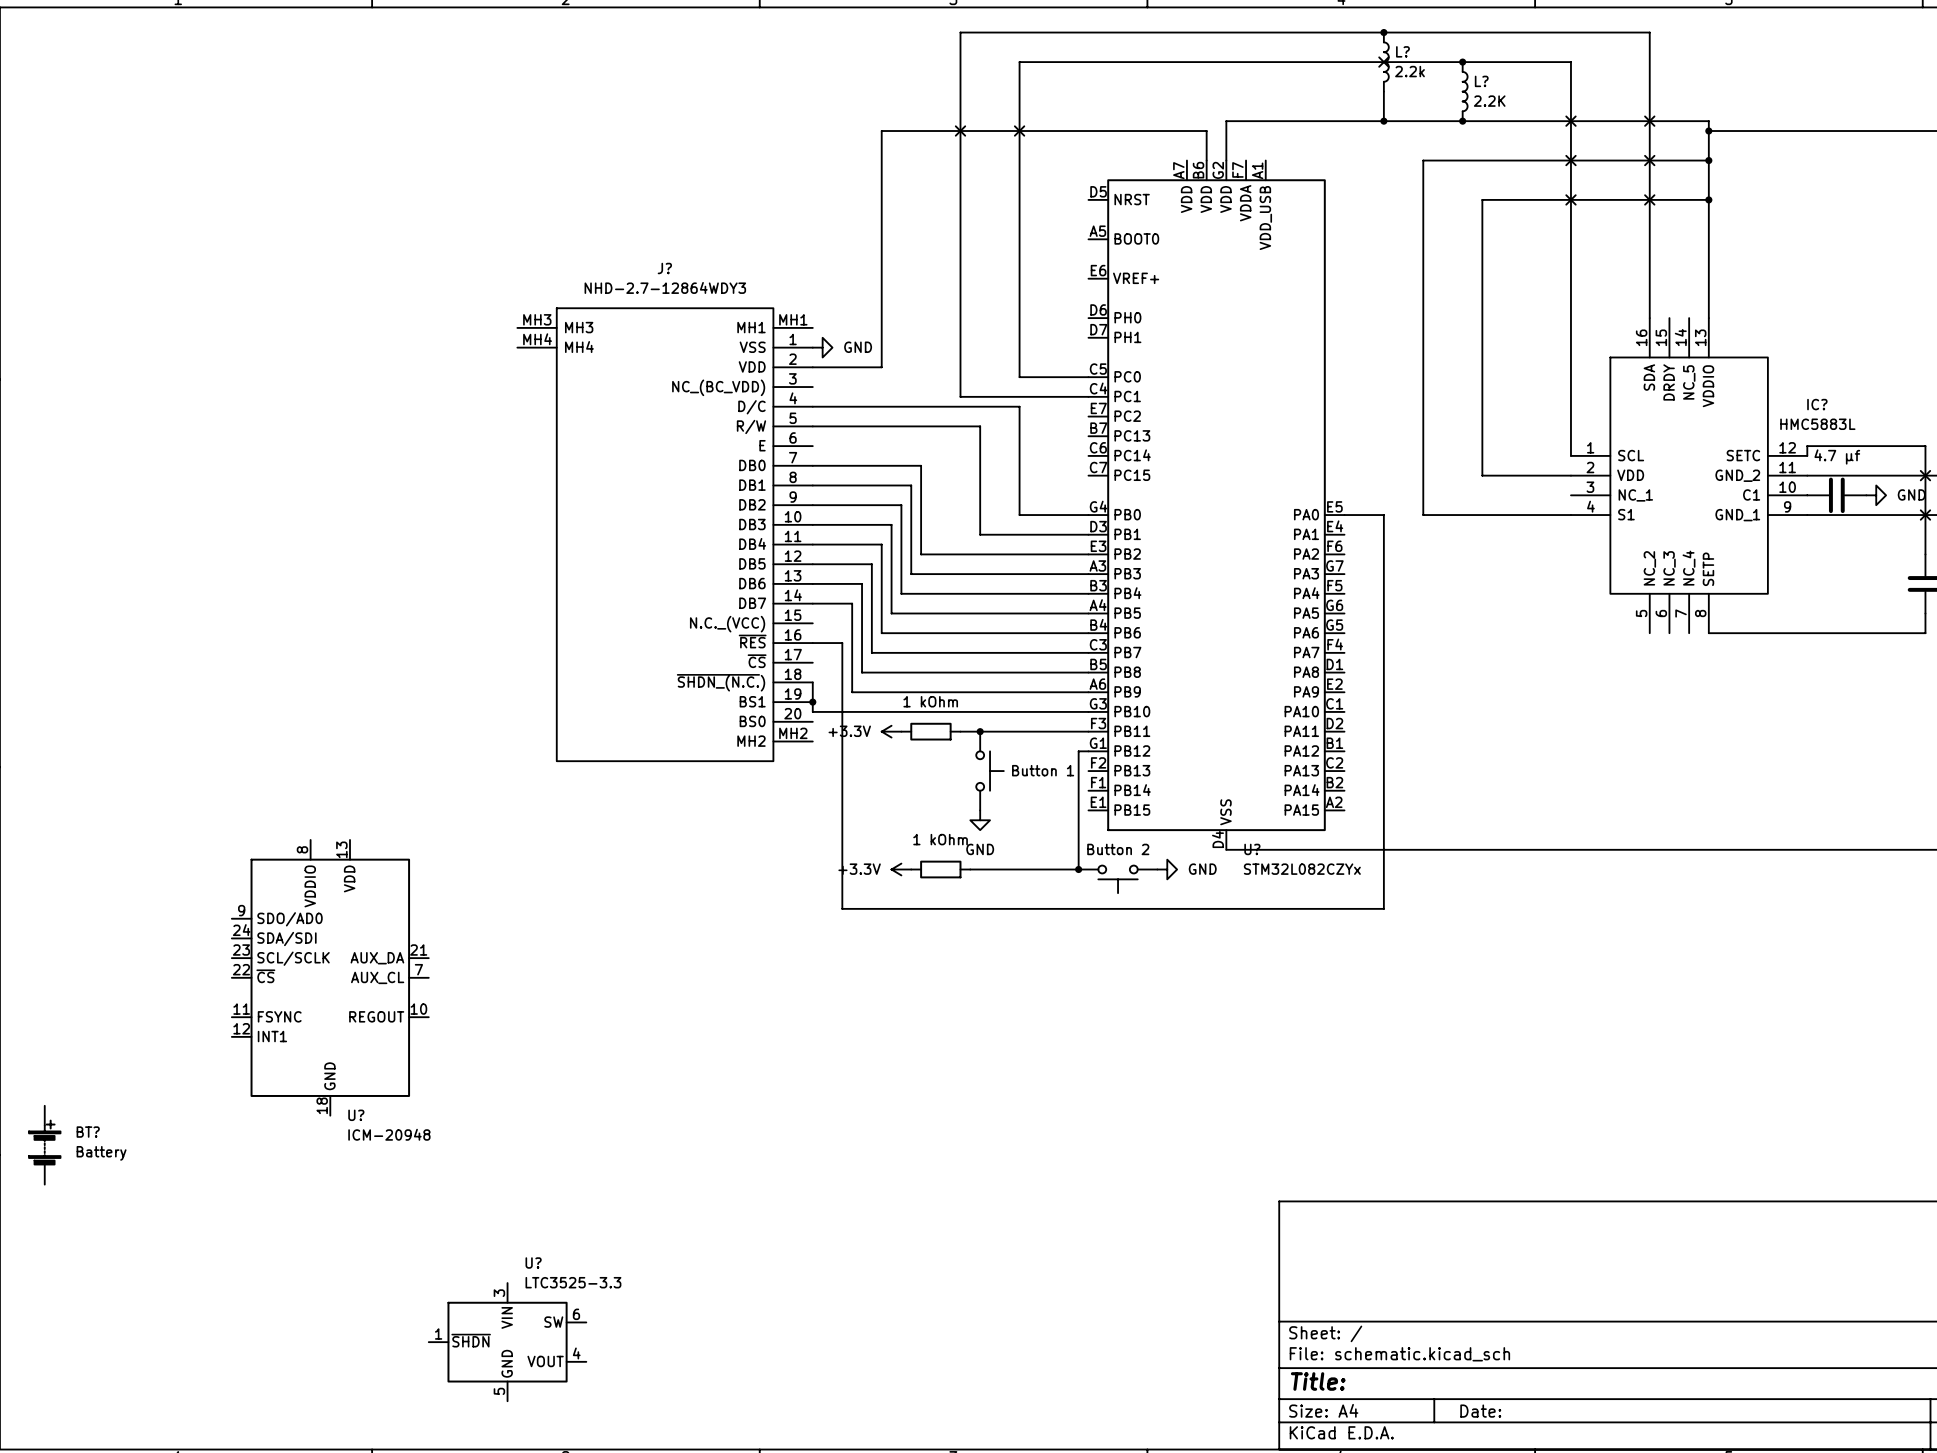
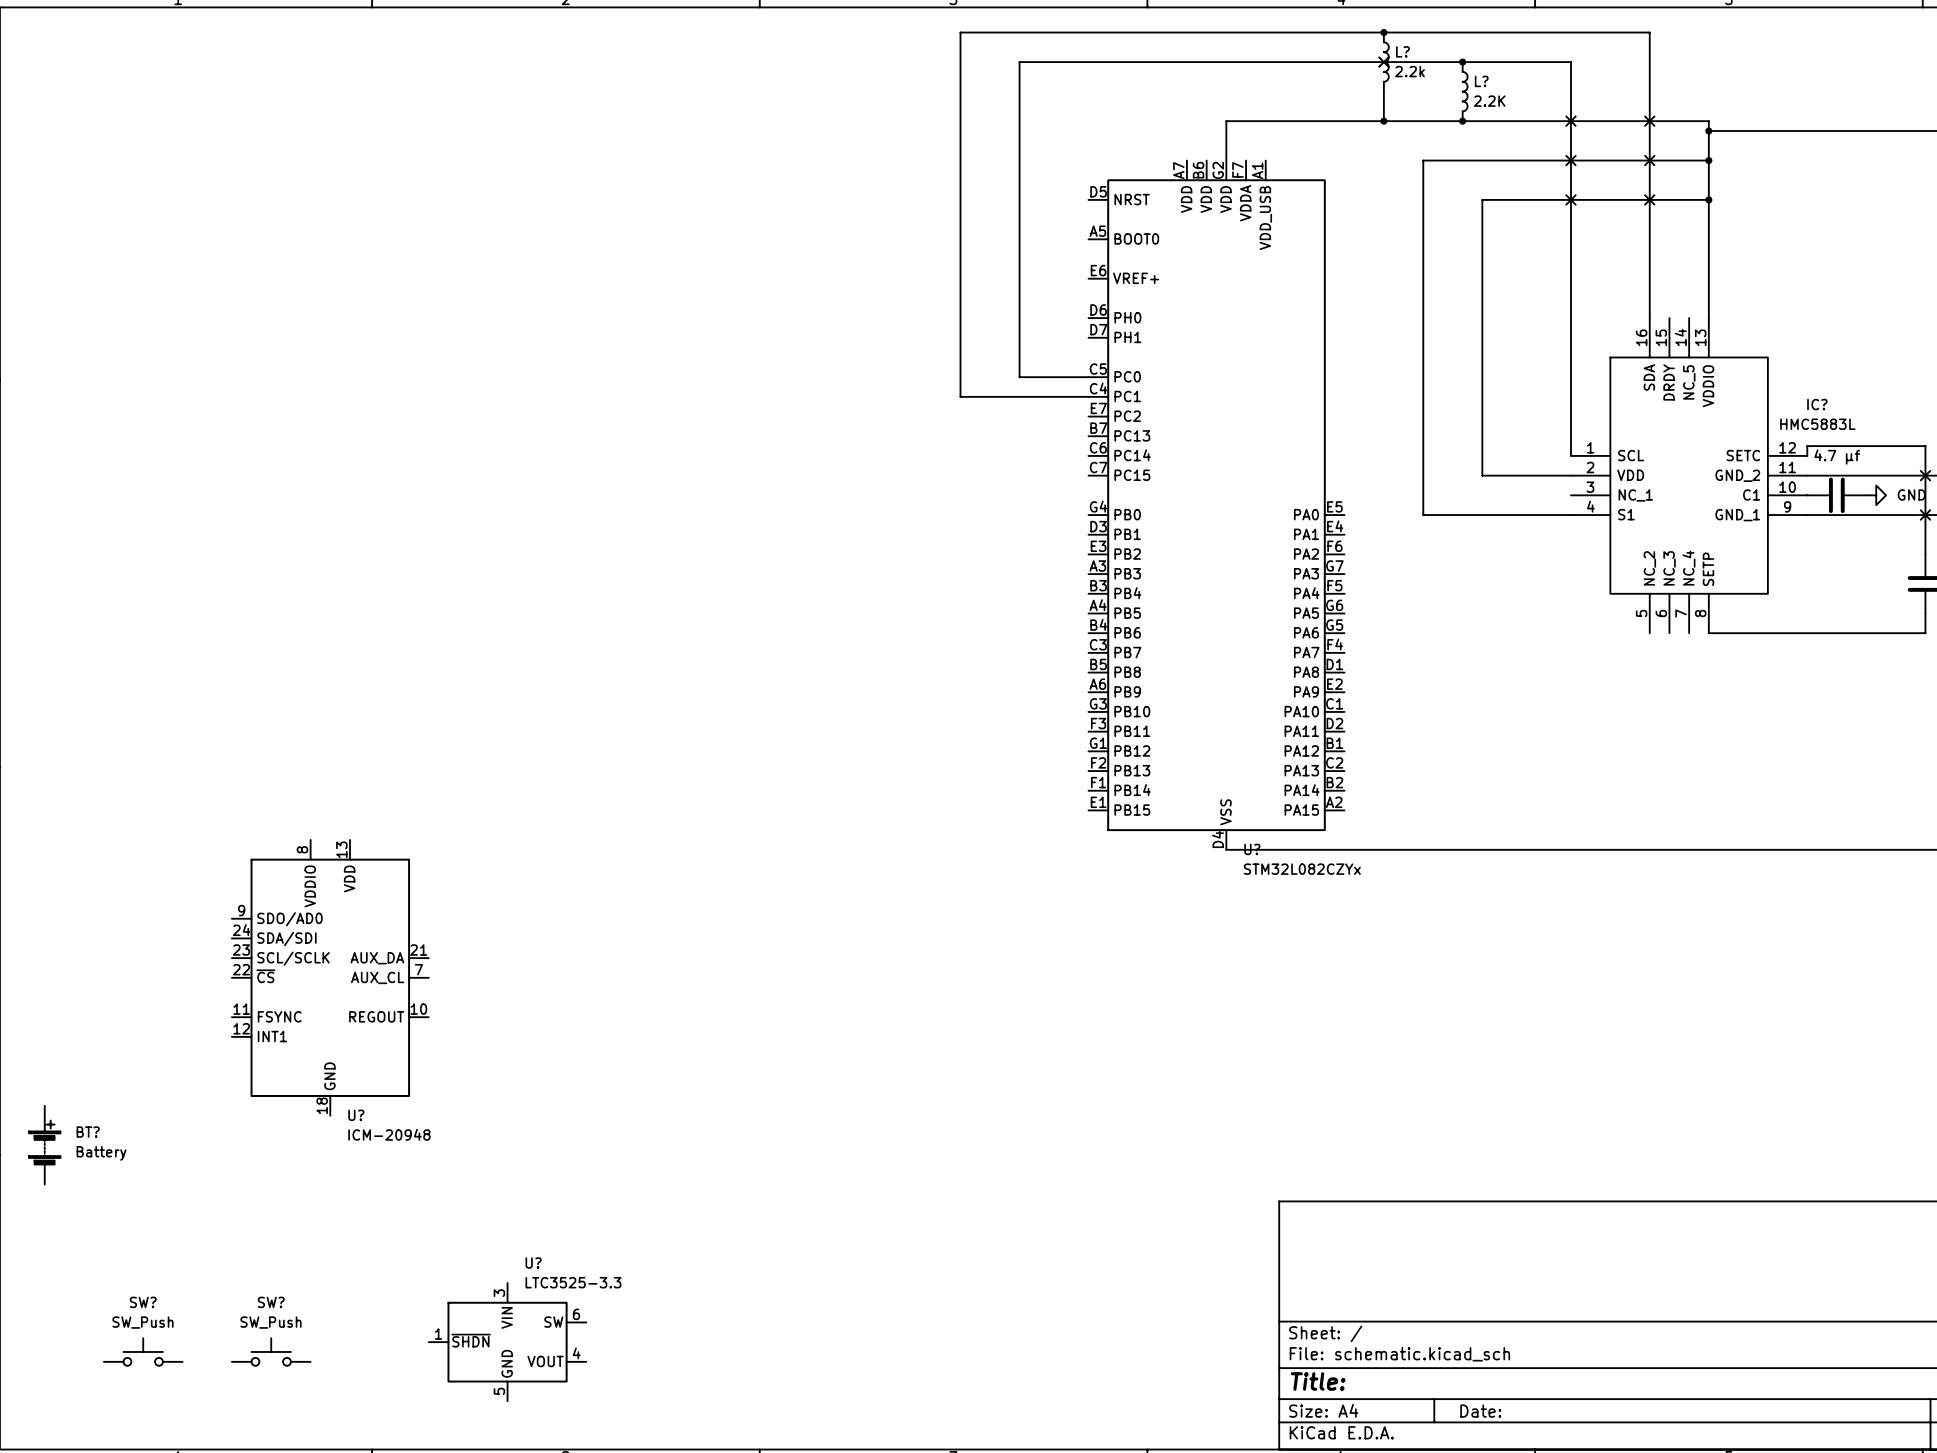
no-connect mark: (960, 131) -> none
no-connect mark: (1019, 131) -> none
wire: (1206, 160) (1206, 131) (881, 131) (881, 367) (812, 367) -> none
power symbol: GND (822, 347) -> none
wire: (812, 406) (1019, 406) (1019, 515) (1088, 515) -> none
wire: (812, 426) (980, 426) (980, 534) (1088, 534) -> none
wire: (812, 465) (921, 465) (921, 554) (1088, 554) -> none
wire: (812, 485) (911, 485) (911, 574) (1088, 574) -> none
wire: (812, 505) (901, 505) (901, 593) (1088, 593) -> none
wire: (1344, 515) (1383, 515) (1383, 908) (842, 908) (842, 643) (812, 643) -> none
wire: (812, 524) (891, 524) (891, 613) (1088, 613) -> none
J?: NHD-2.7-12864WDY3 (665, 534) -> none
wire: (812, 544) (881, 544) (881, 633) (1088, 633) -> none
wire: (812, 564) (871, 564) (871, 652) (1088, 652) -> none
wire: (812, 583) (862, 583) (862, 672) (1088, 672) -> none
wire: (812, 603) (852, 603) (852, 692) (1088, 692) -> none
wire: (812, 682) (812, 711) (1088, 711) -> none
junction: (812, 702) -> none
power symbol: +3.3V (891, 731) -> none
part: 1 kOhm (930, 731) -> none
wire: (960, 731) (1088, 731) -> none
junction: (980, 731) -> none
wire: (1088, 751) (1078, 751) (1078, 869) (970, 869) -> none
part: Button 1 (990, 771) -> none
power symbol: GND (980, 820) -> none
power symbol: +3.3V (901, 869) -> none
part: 1 kOhm (940, 869) -> none
junction: (1078, 869) -> none
power symbol: GND (1167, 869) -> none
part: Button 2 (1118, 879) -> none
SW?: none -> SW_Push (143, 1351)
SW?: none -> SW_Push (271, 1351)

